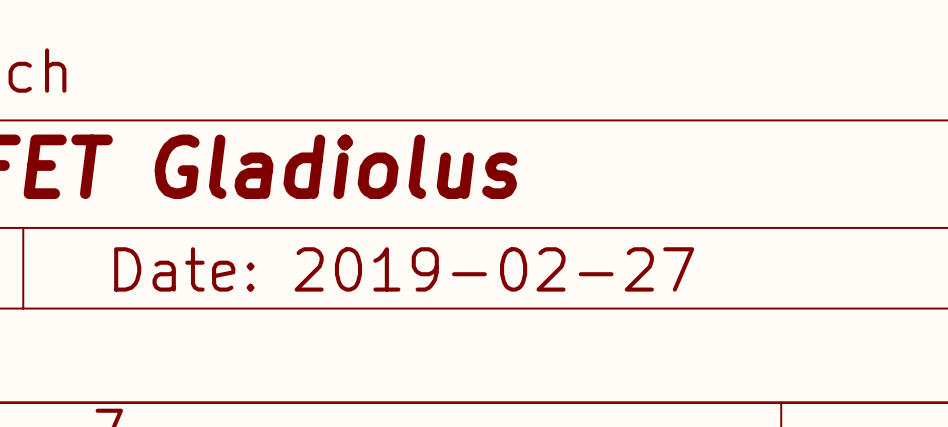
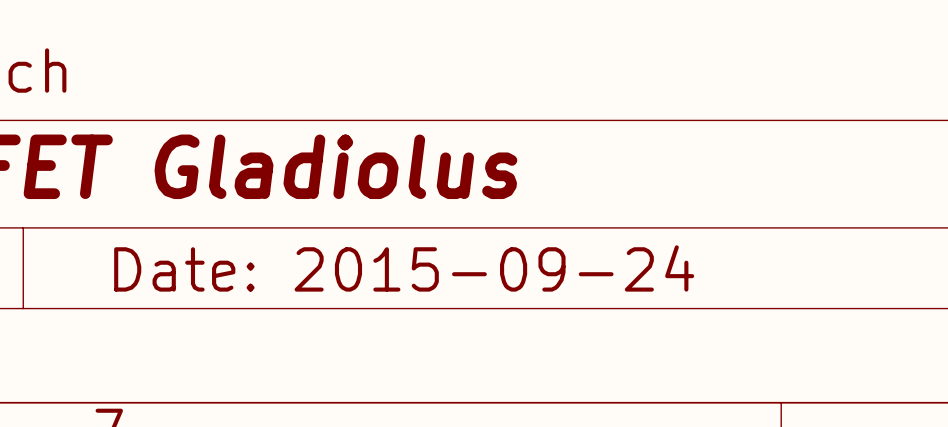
title block: Date: 2019-02-27 (404, 269) -> Date: 2015-09-24 (404, 268)

